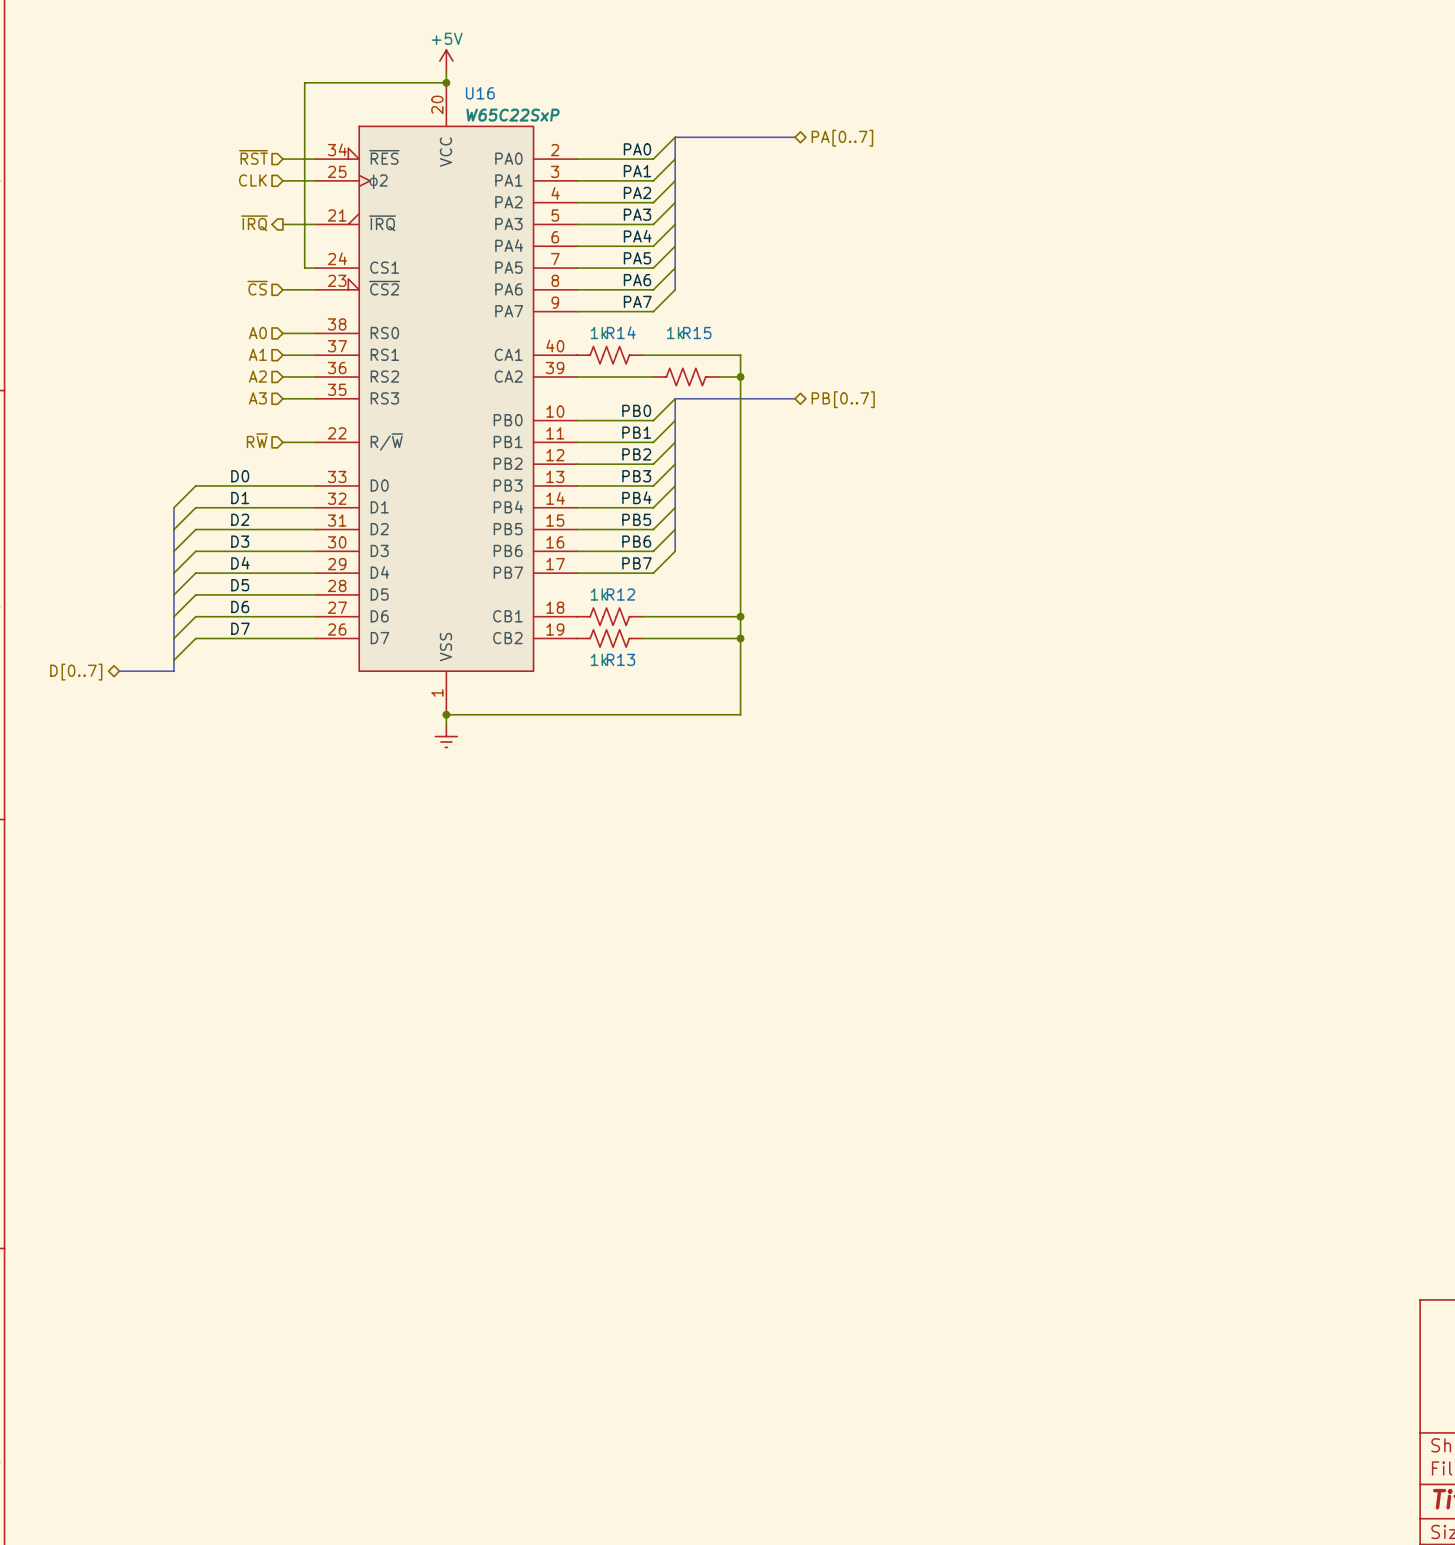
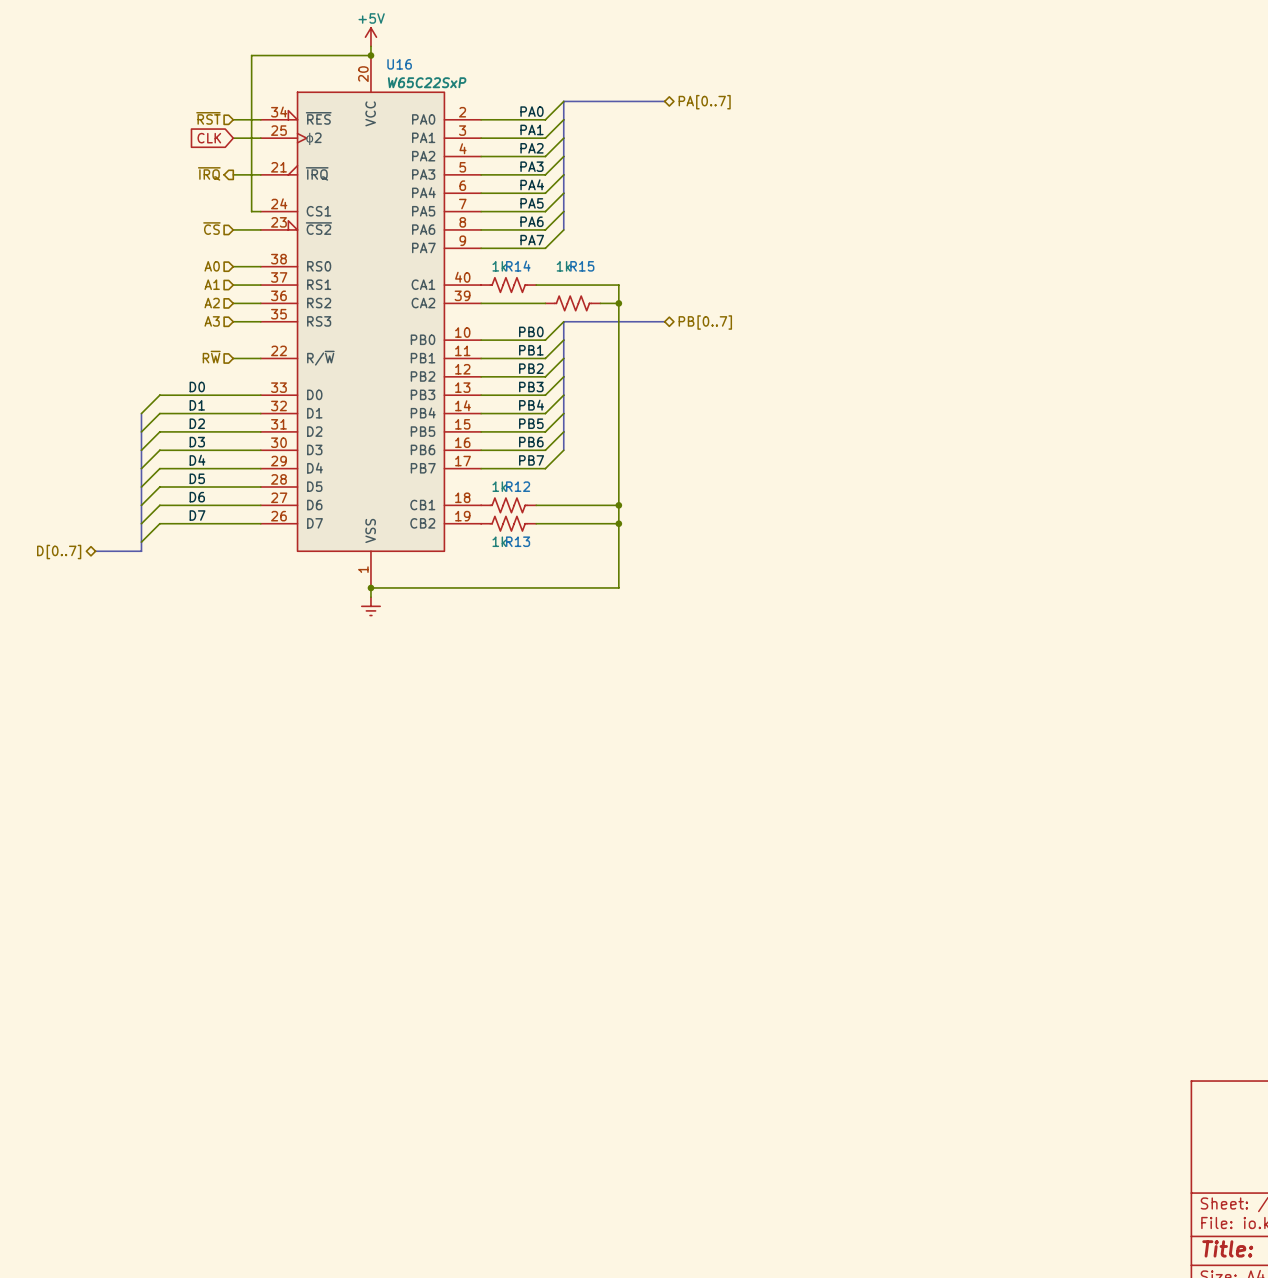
hierarchical label: CLK (252, 180) -> none
global label: none -> CLK (209, 138)

